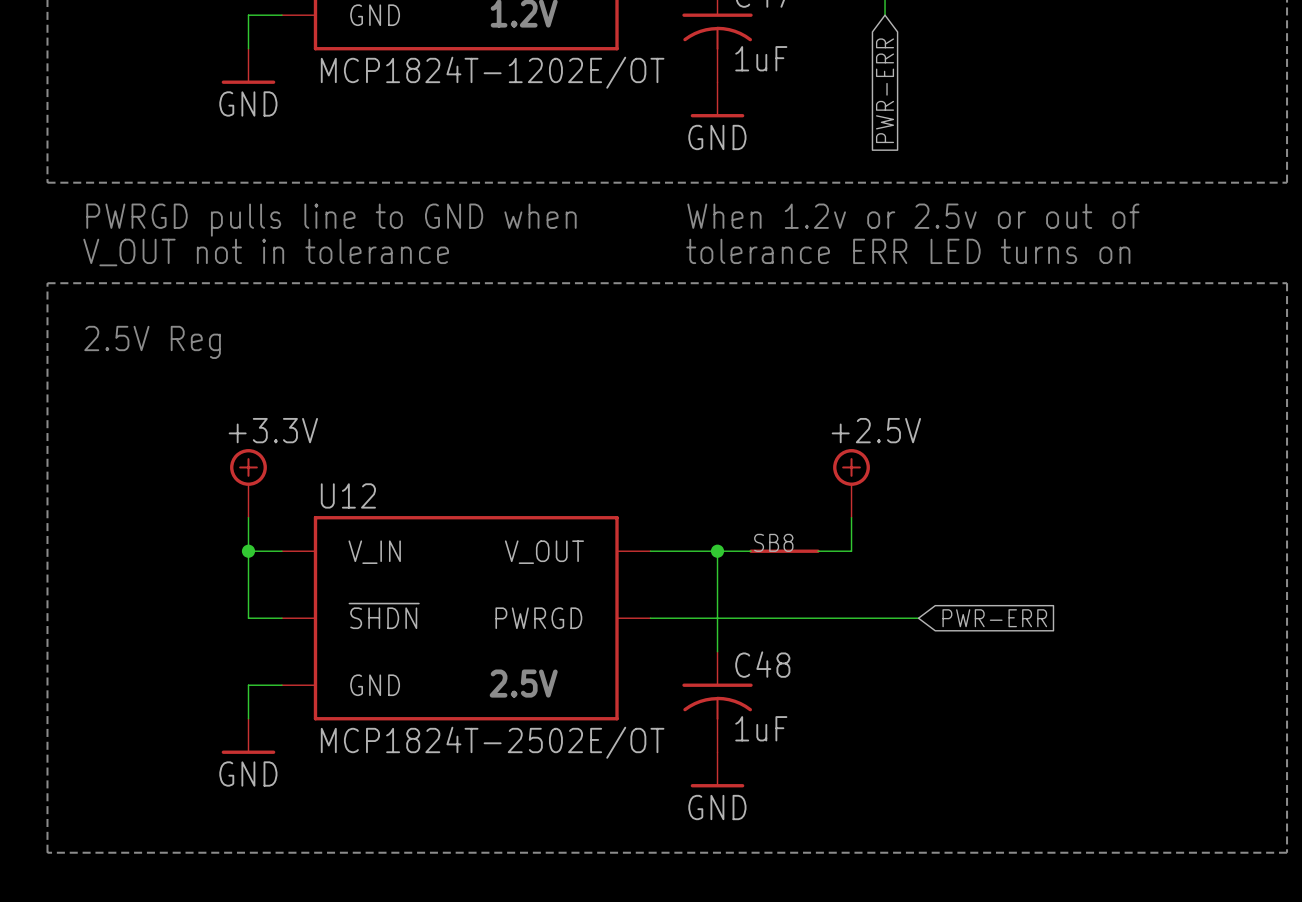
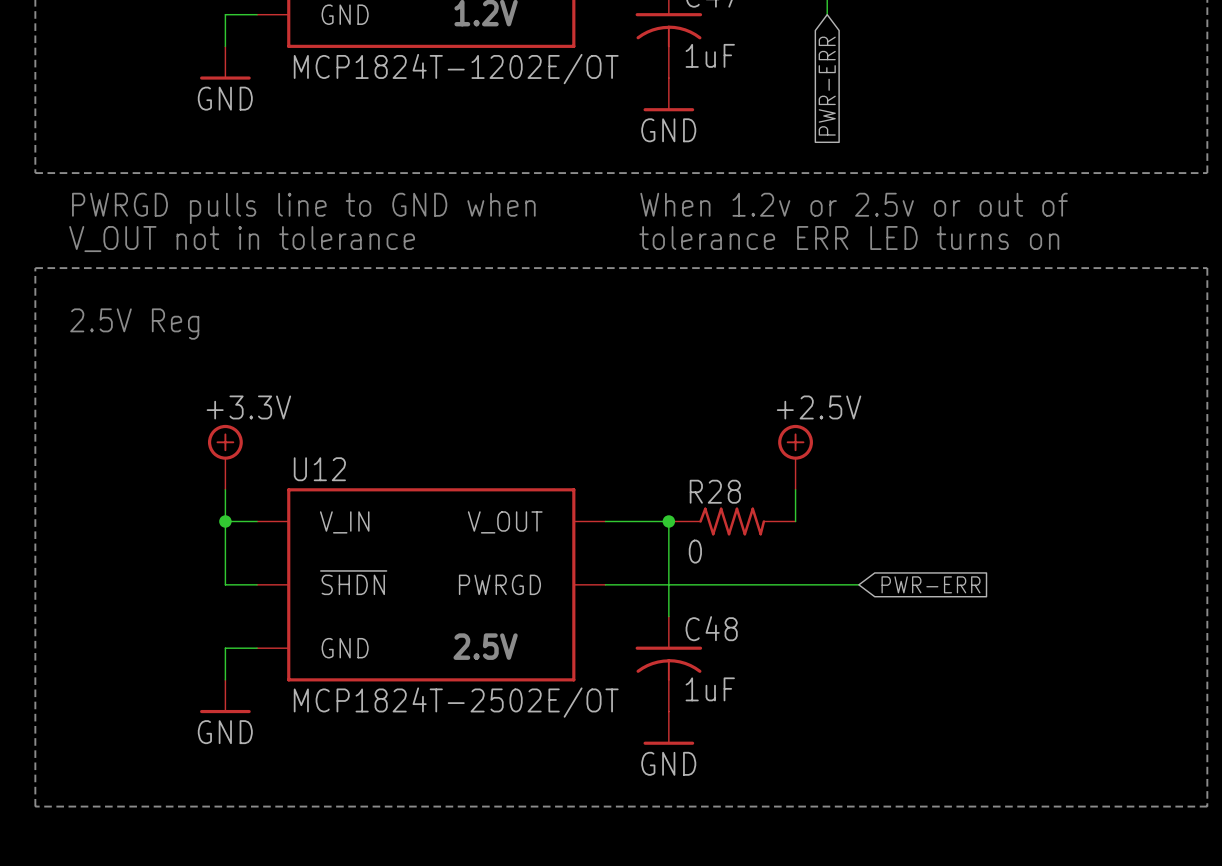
SB8: (784, 551) -> none
R28: none -> 0 (732, 521)

